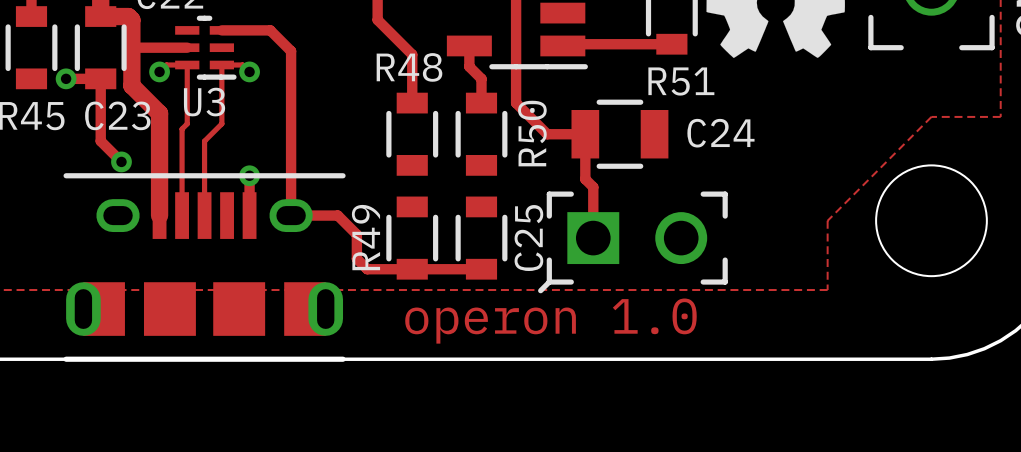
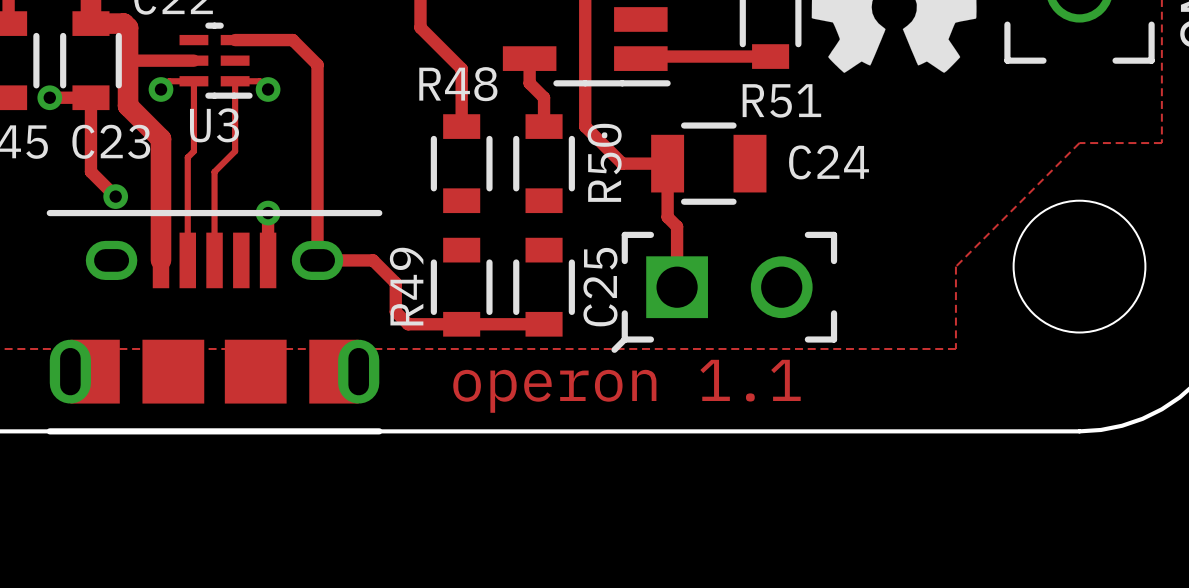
text: operon 1.0 (550, 321) -> operon 1.1 (626, 386)

